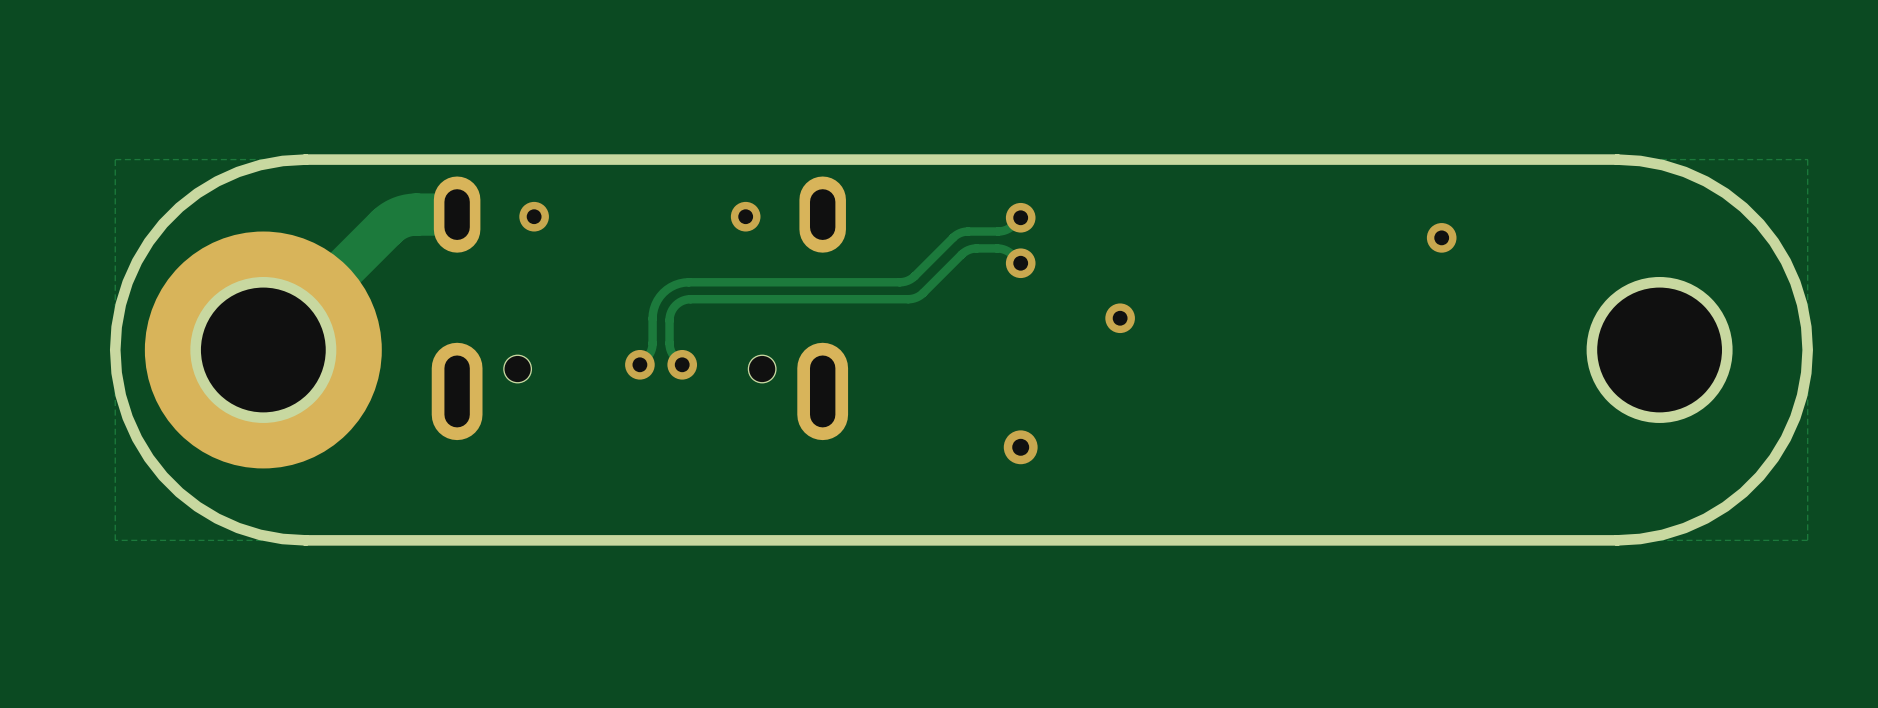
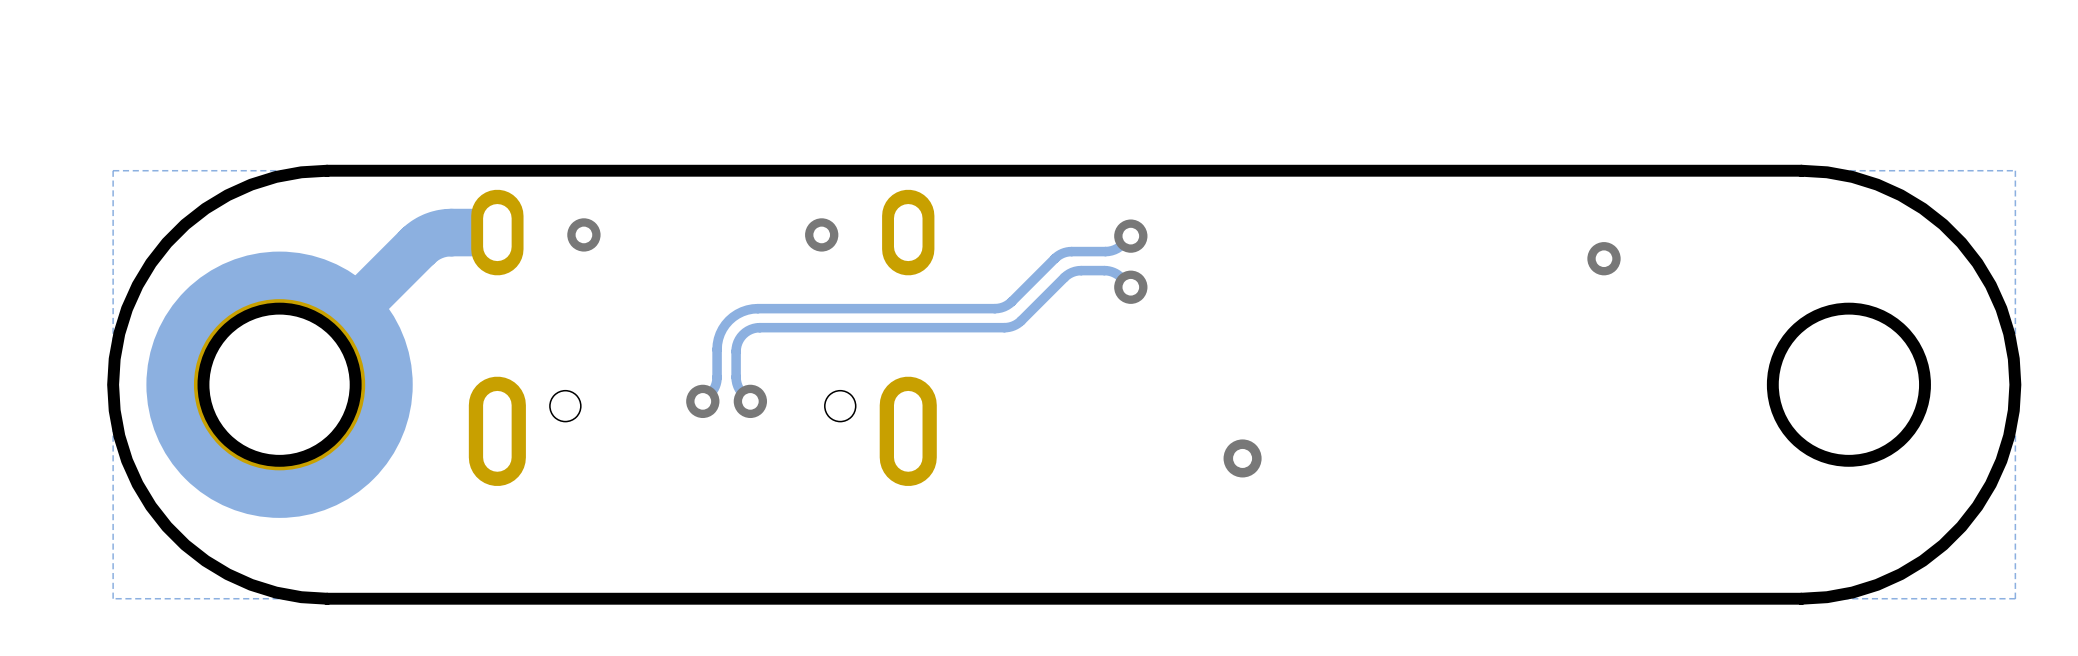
via: (1120, 318) -> none
via position: (1020, 447) -> (1242, 458)

